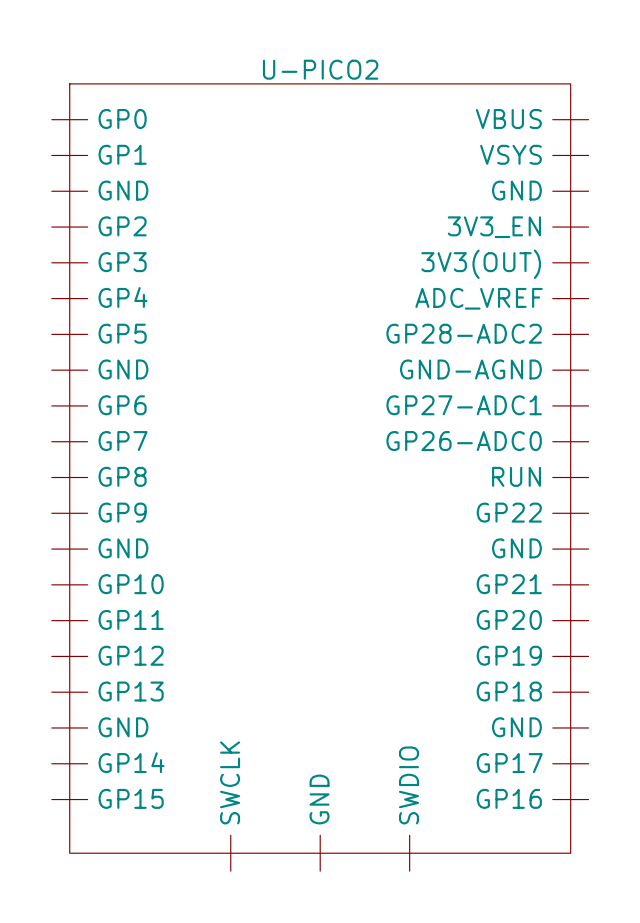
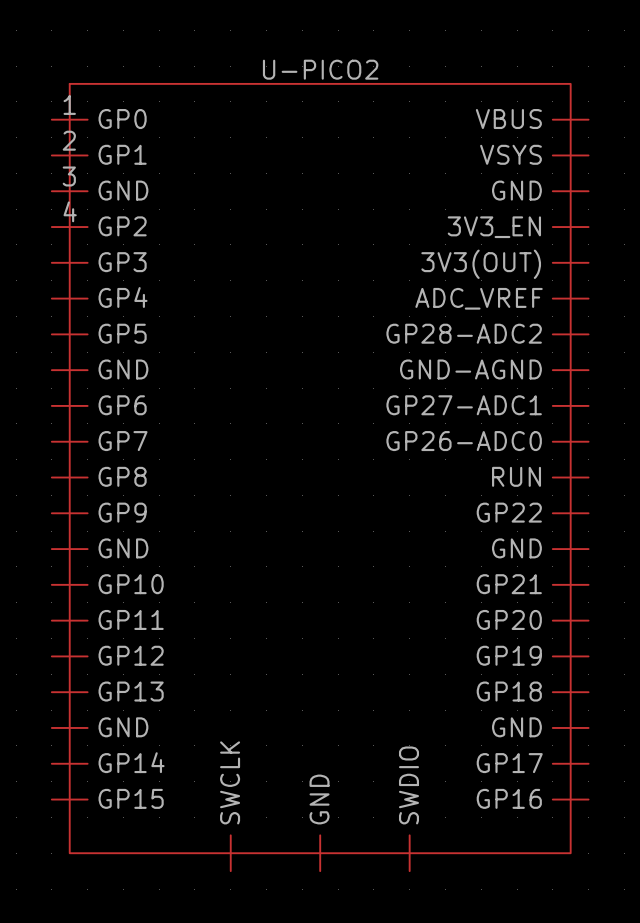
U-PICO2 pin number: none -> 1 (69, 104)
U-PICO2 pin number: none -> 2 (69, 140)
U-PICO2 pin number: none -> 3 (69, 176)
U-PICO2 pin number: none -> 4 (70, 211)

